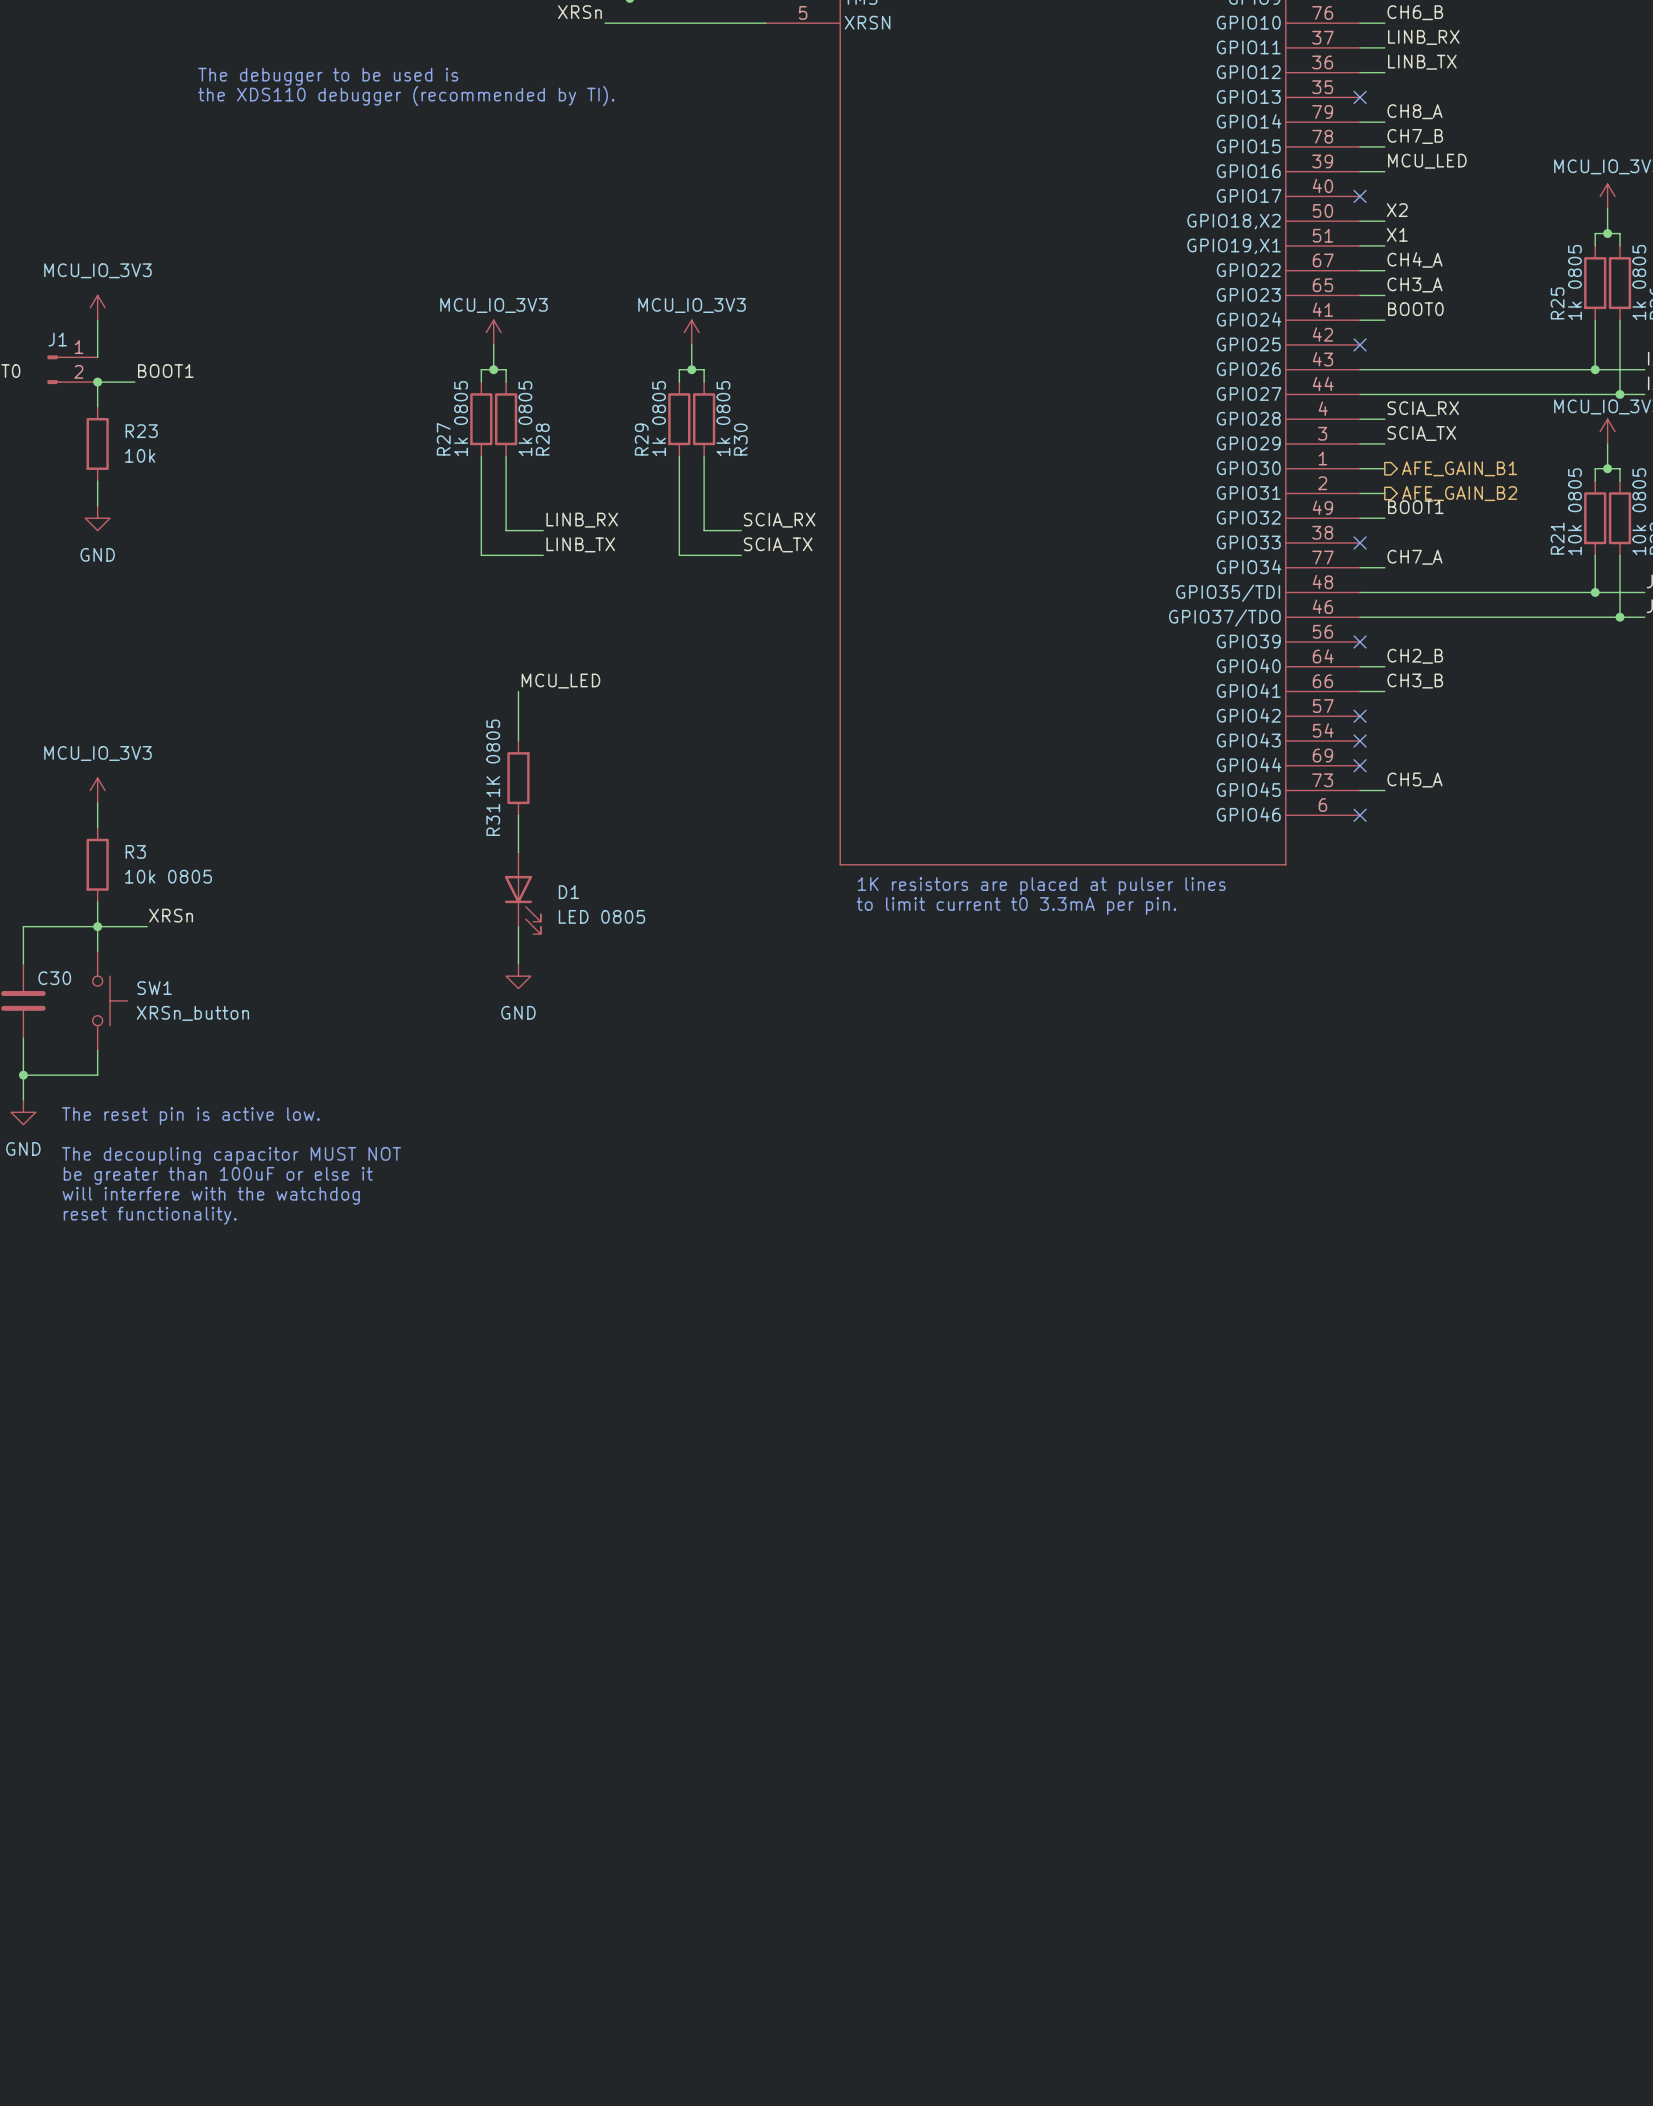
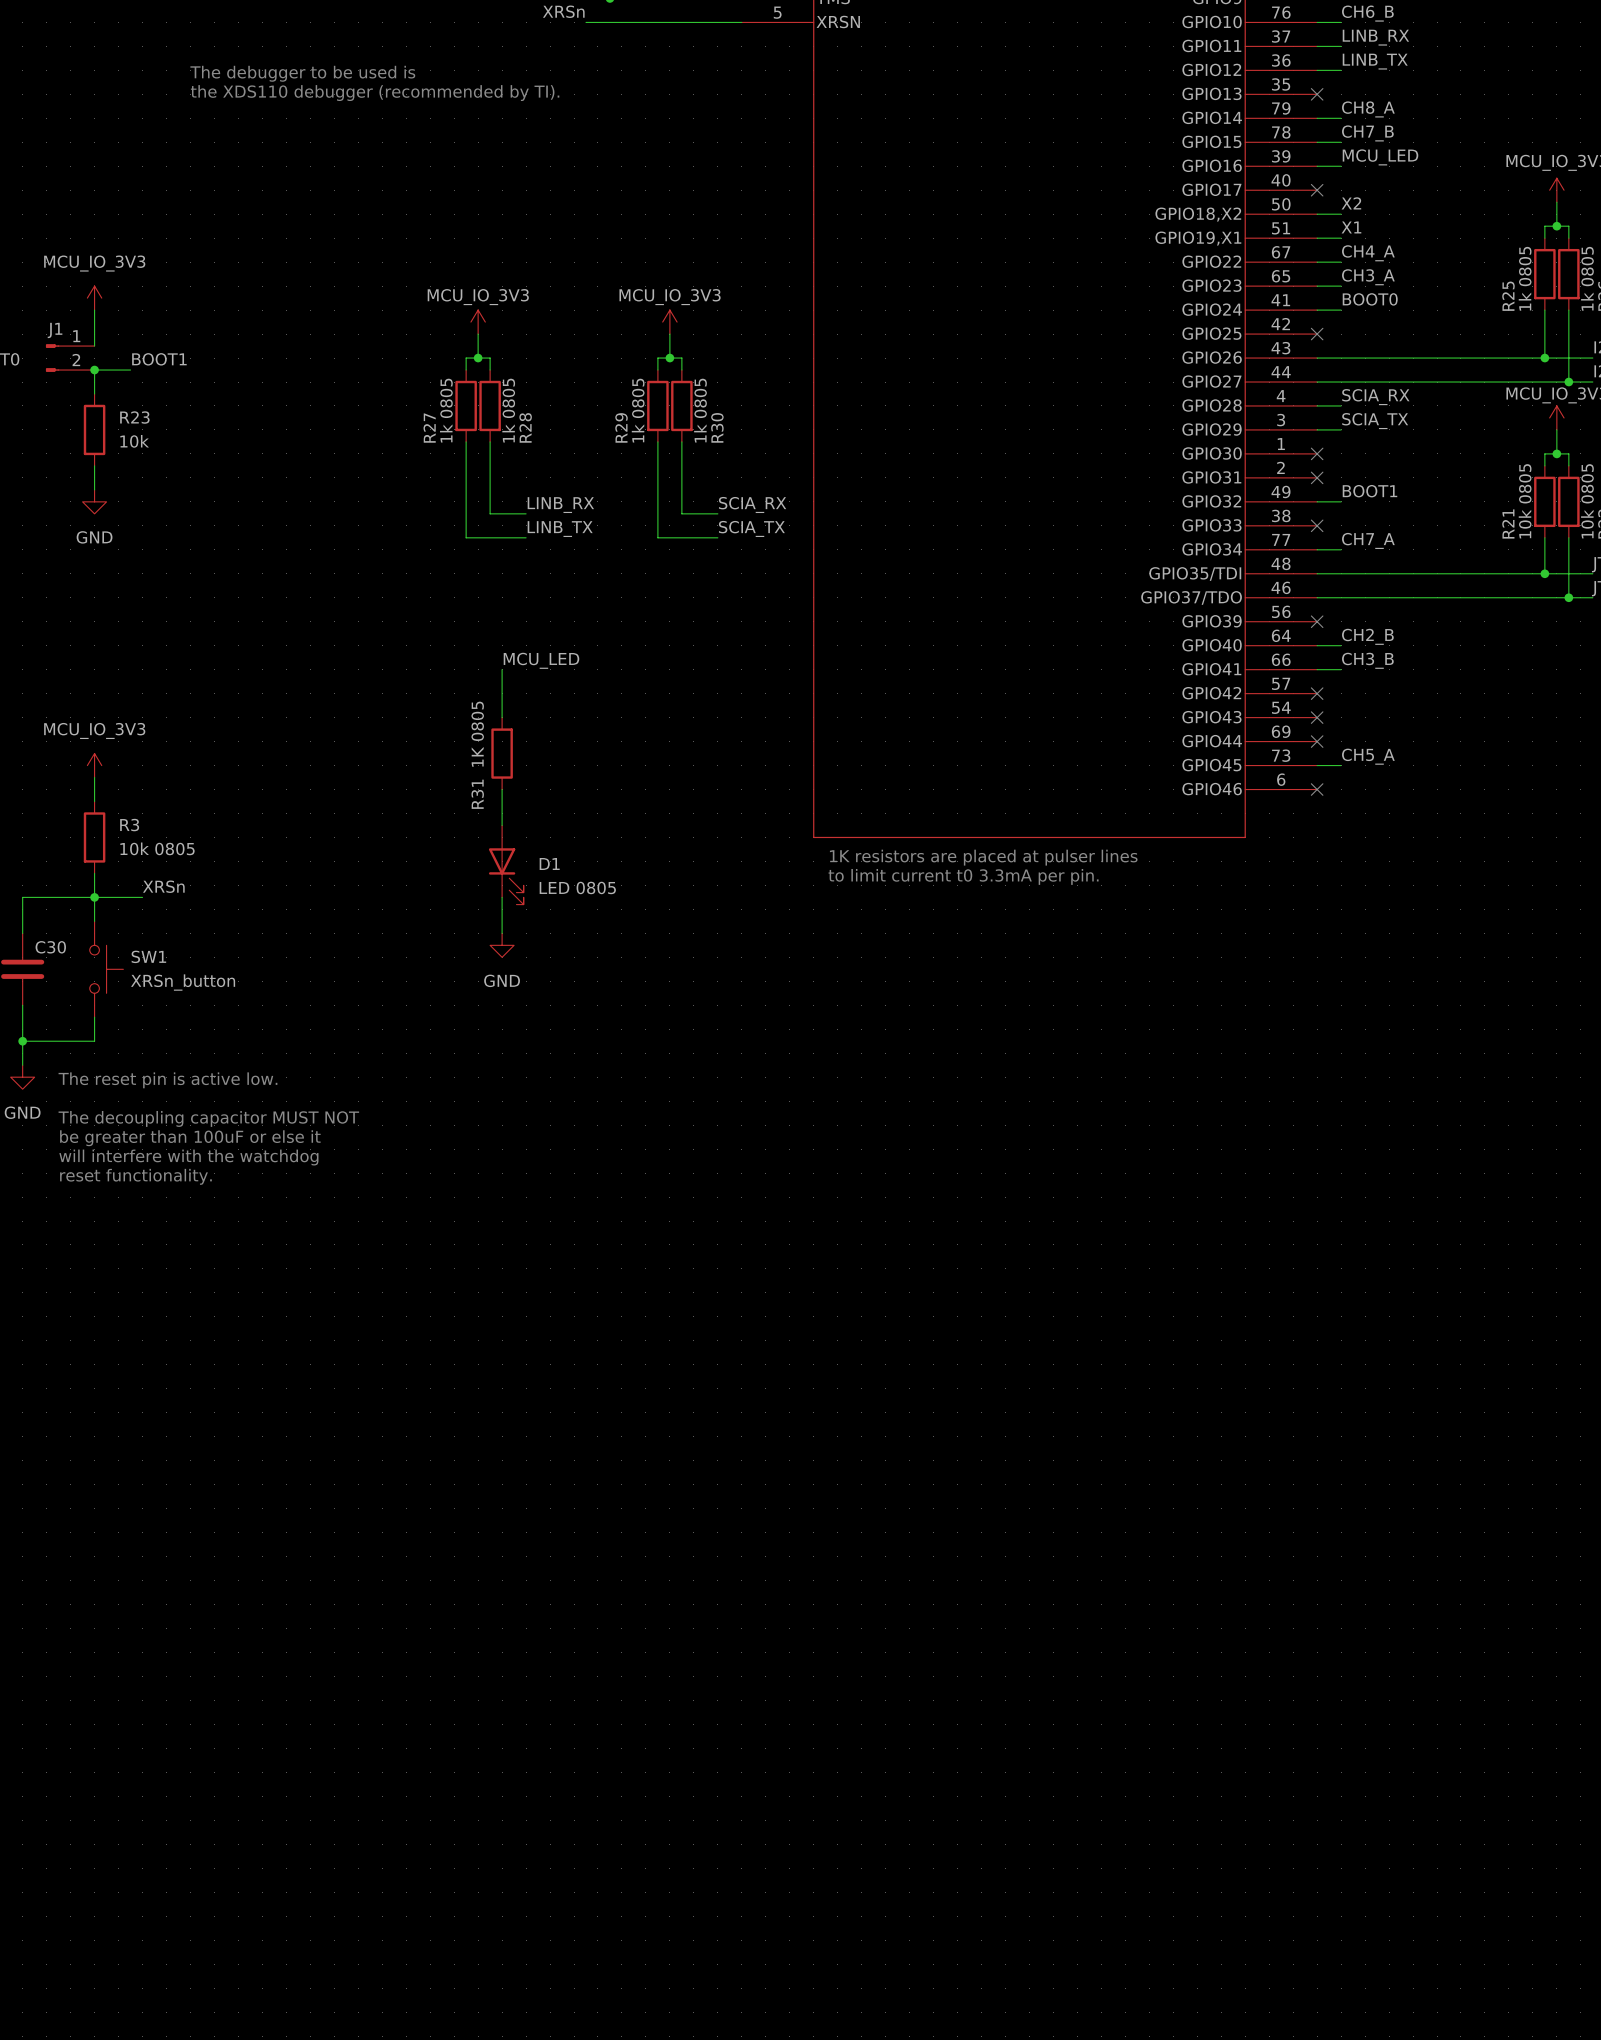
wire: (1360, 468) (1384, 468) -> none
no-connect mark: none -> (1317, 453)
hierarchical label: AFE_GAIN_B1 (1459, 468) -> none
wire: (1360, 493) (1384, 493) -> none
no-connect mark: none -> (1317, 477)
hierarchical label: AFE_GAIN_B2 (1459, 493) -> none

